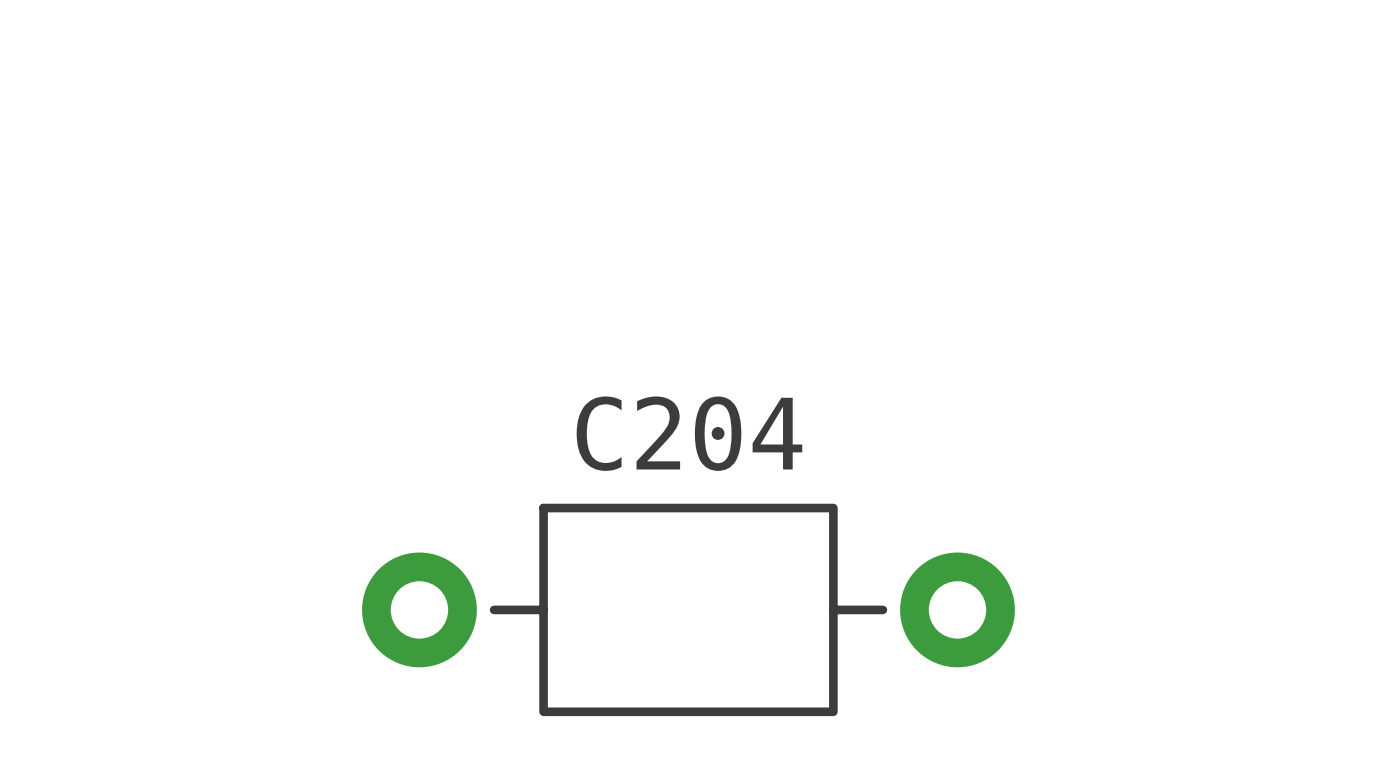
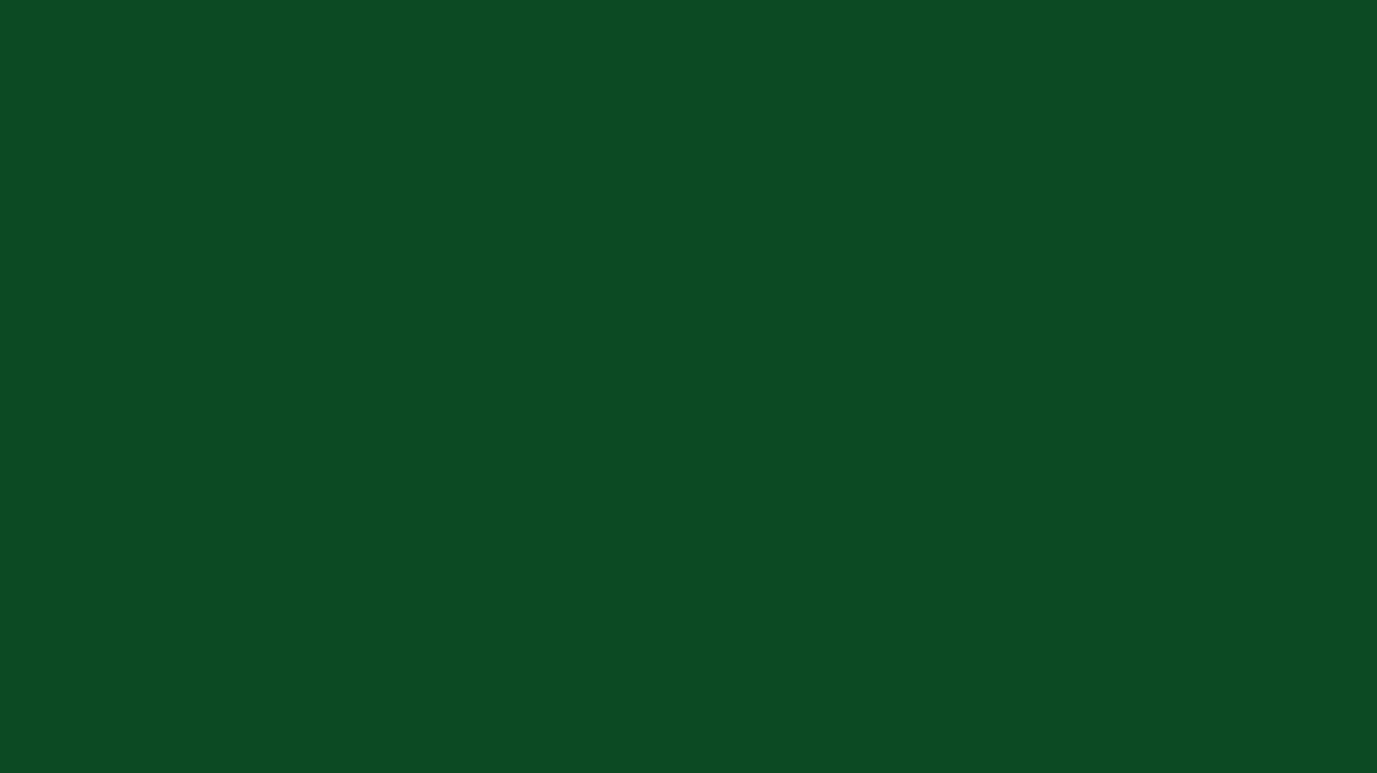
C204: (688, 609) -> none

